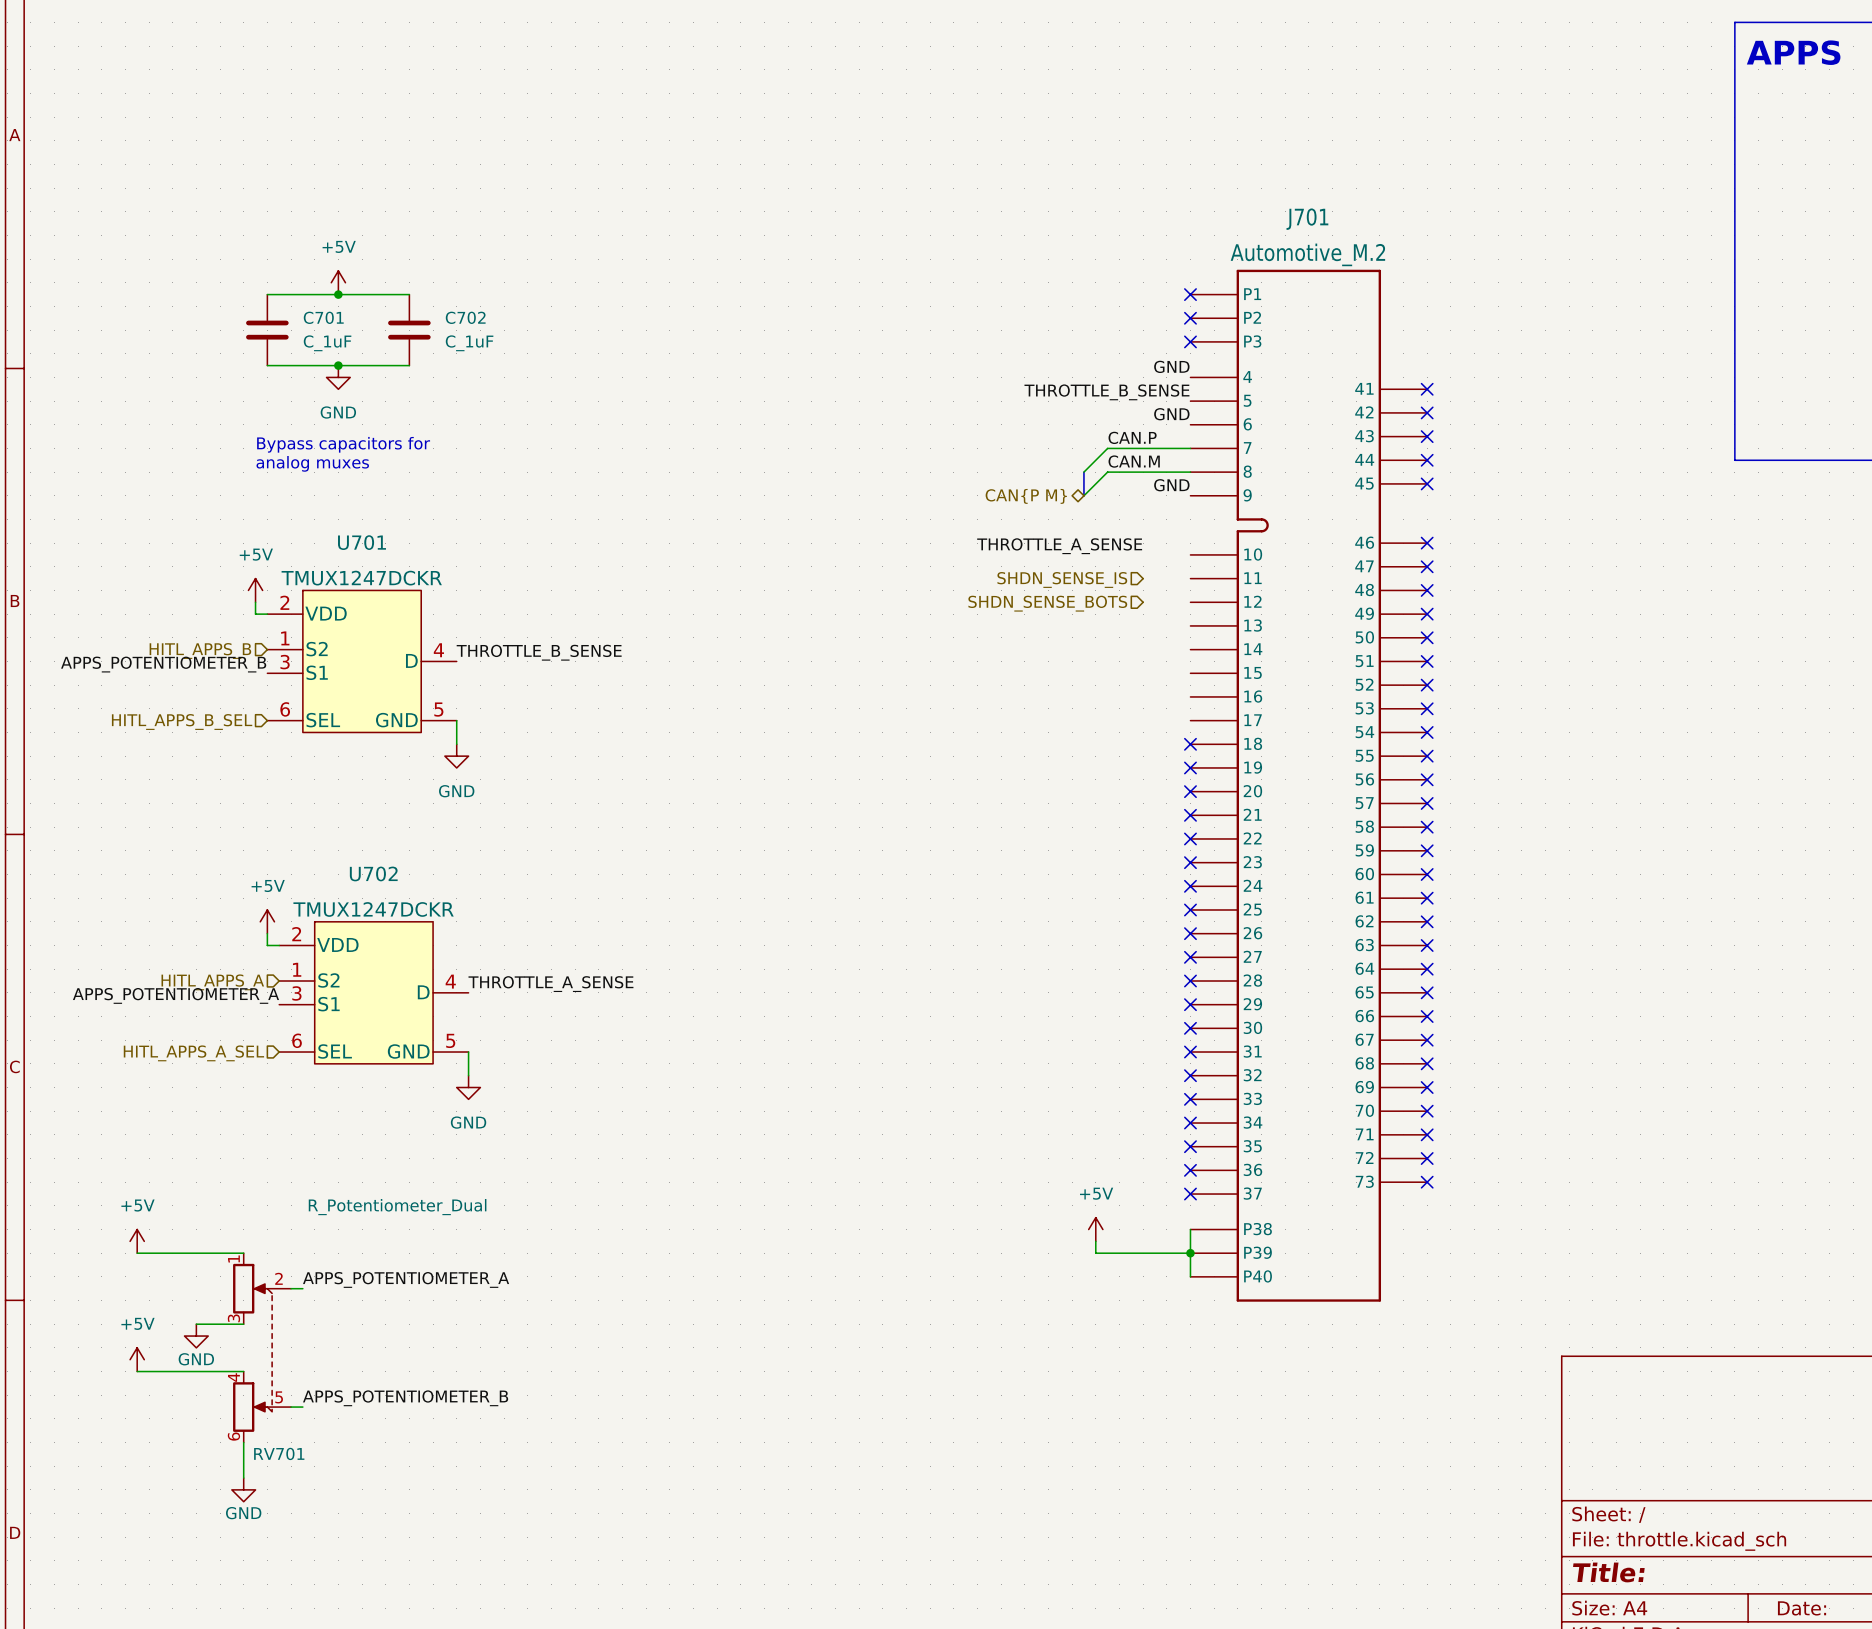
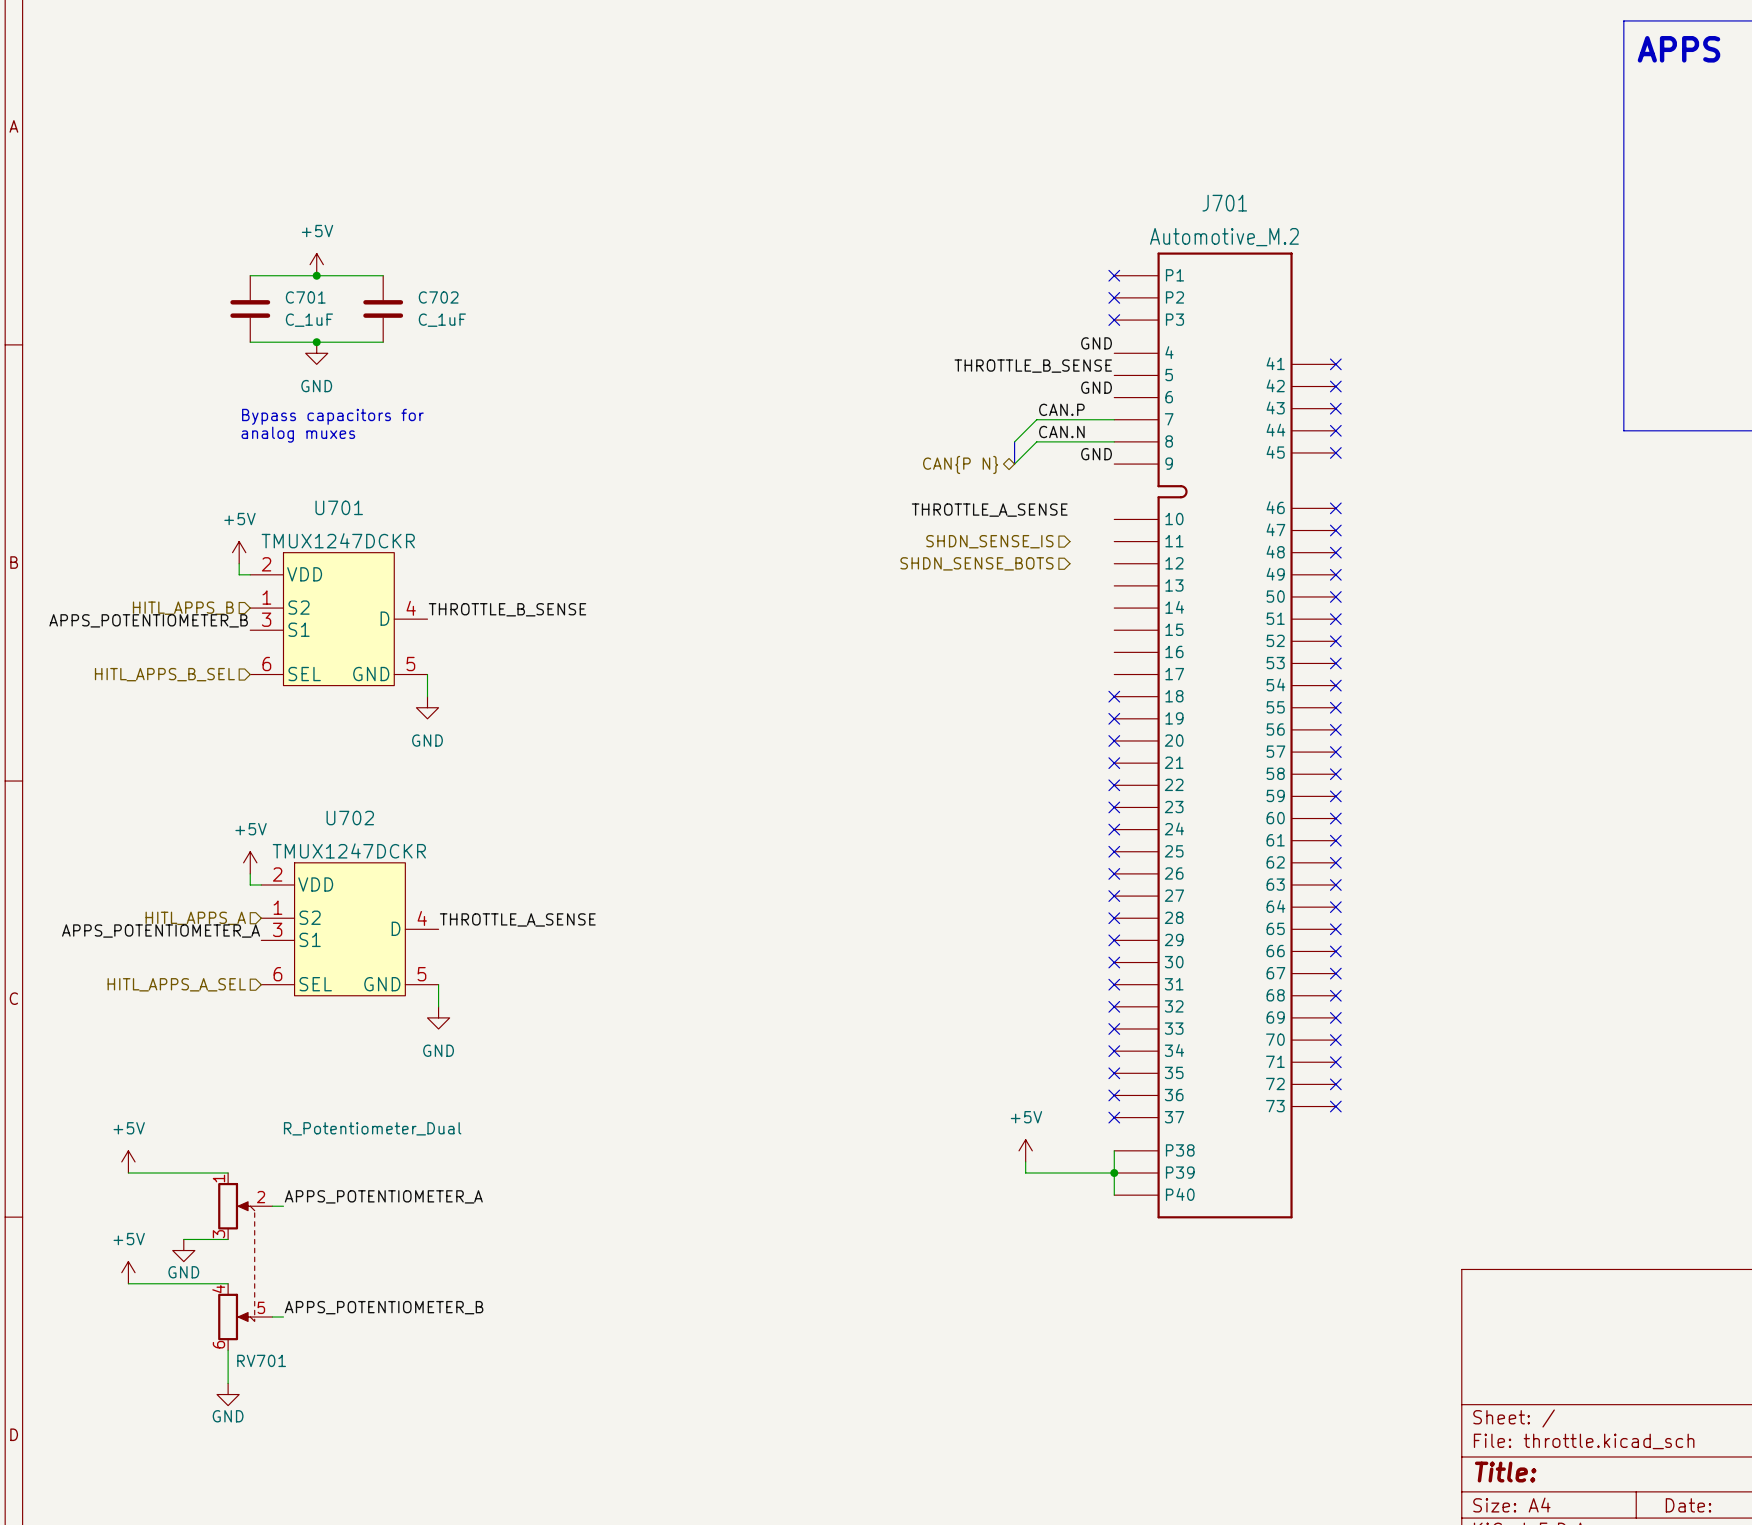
label: CAN.M (1134, 461) -> CAN.N (1061, 432)
hierarchical label: CAN{P M} (1026, 496) -> CAN{P N} (960, 464)

